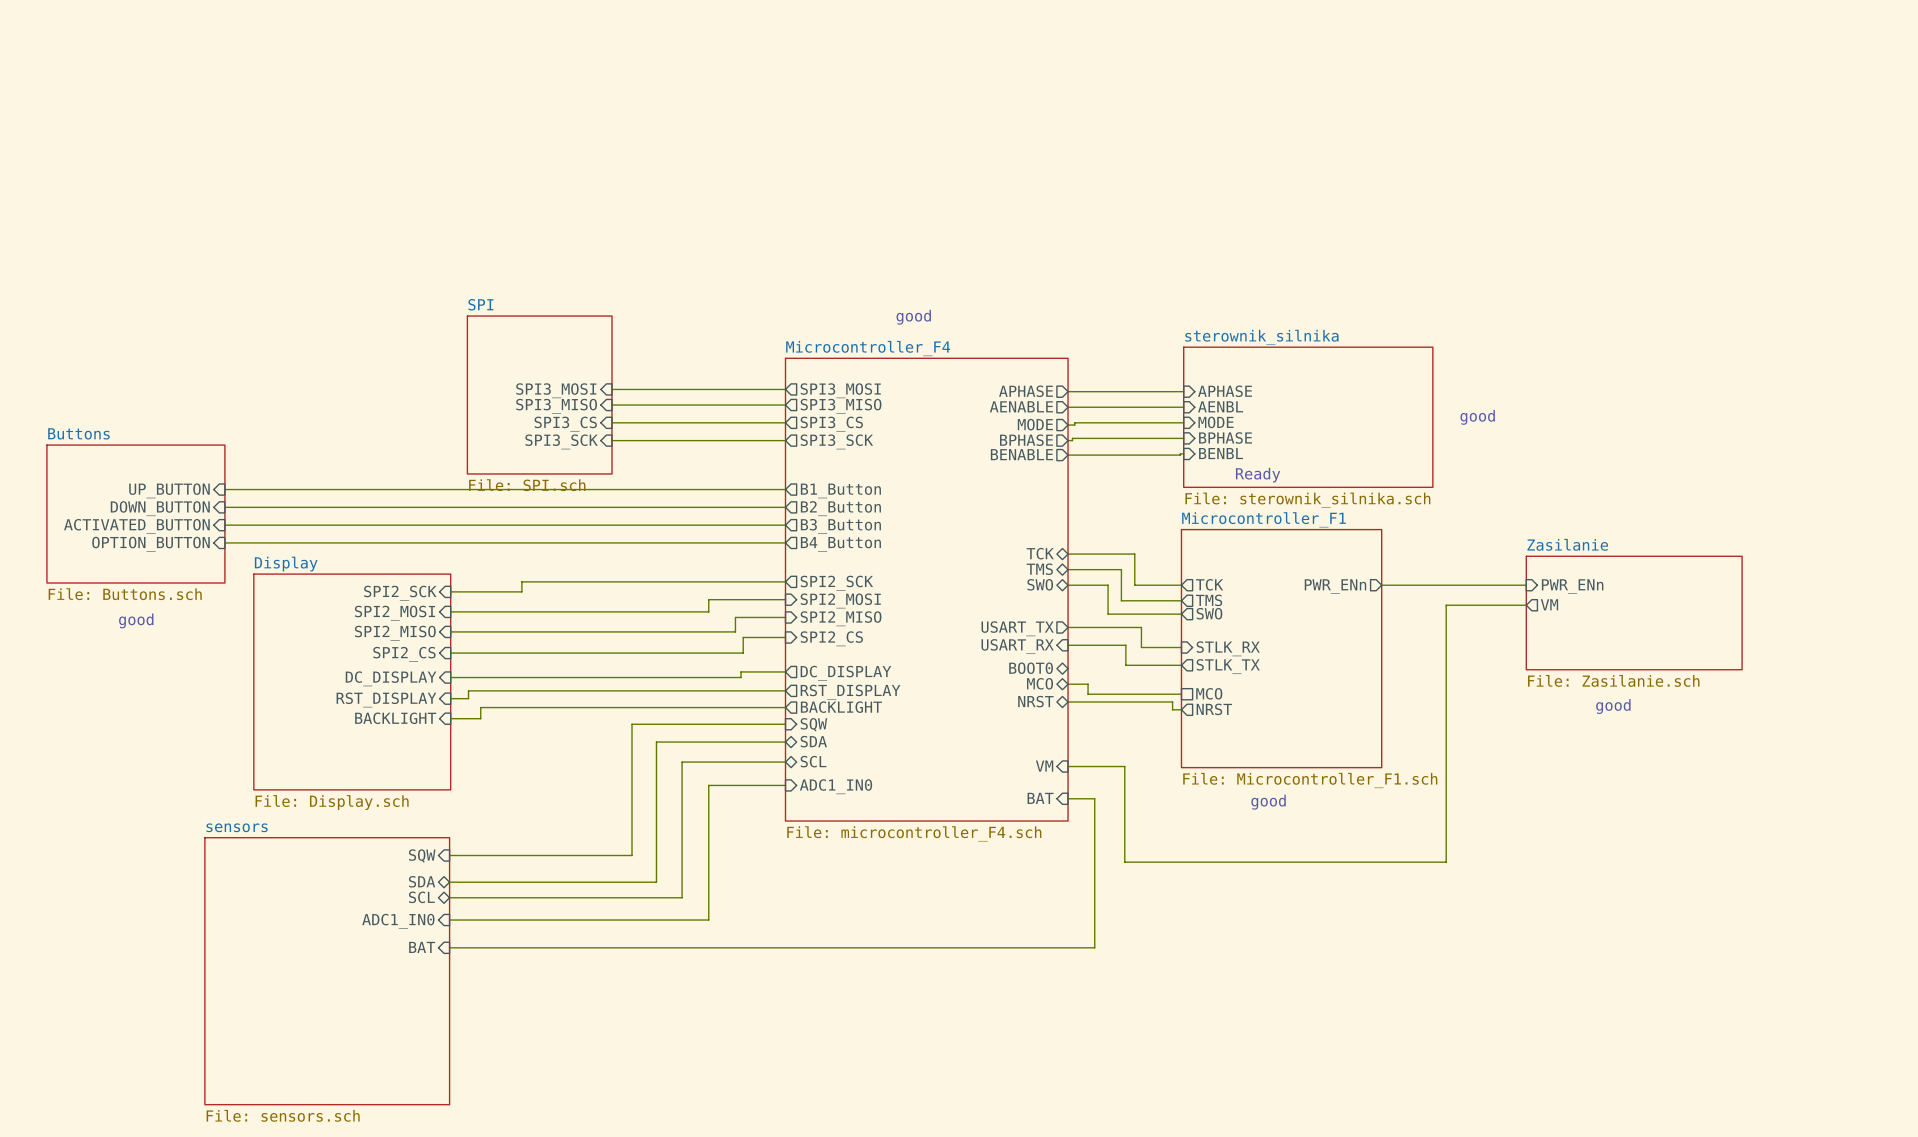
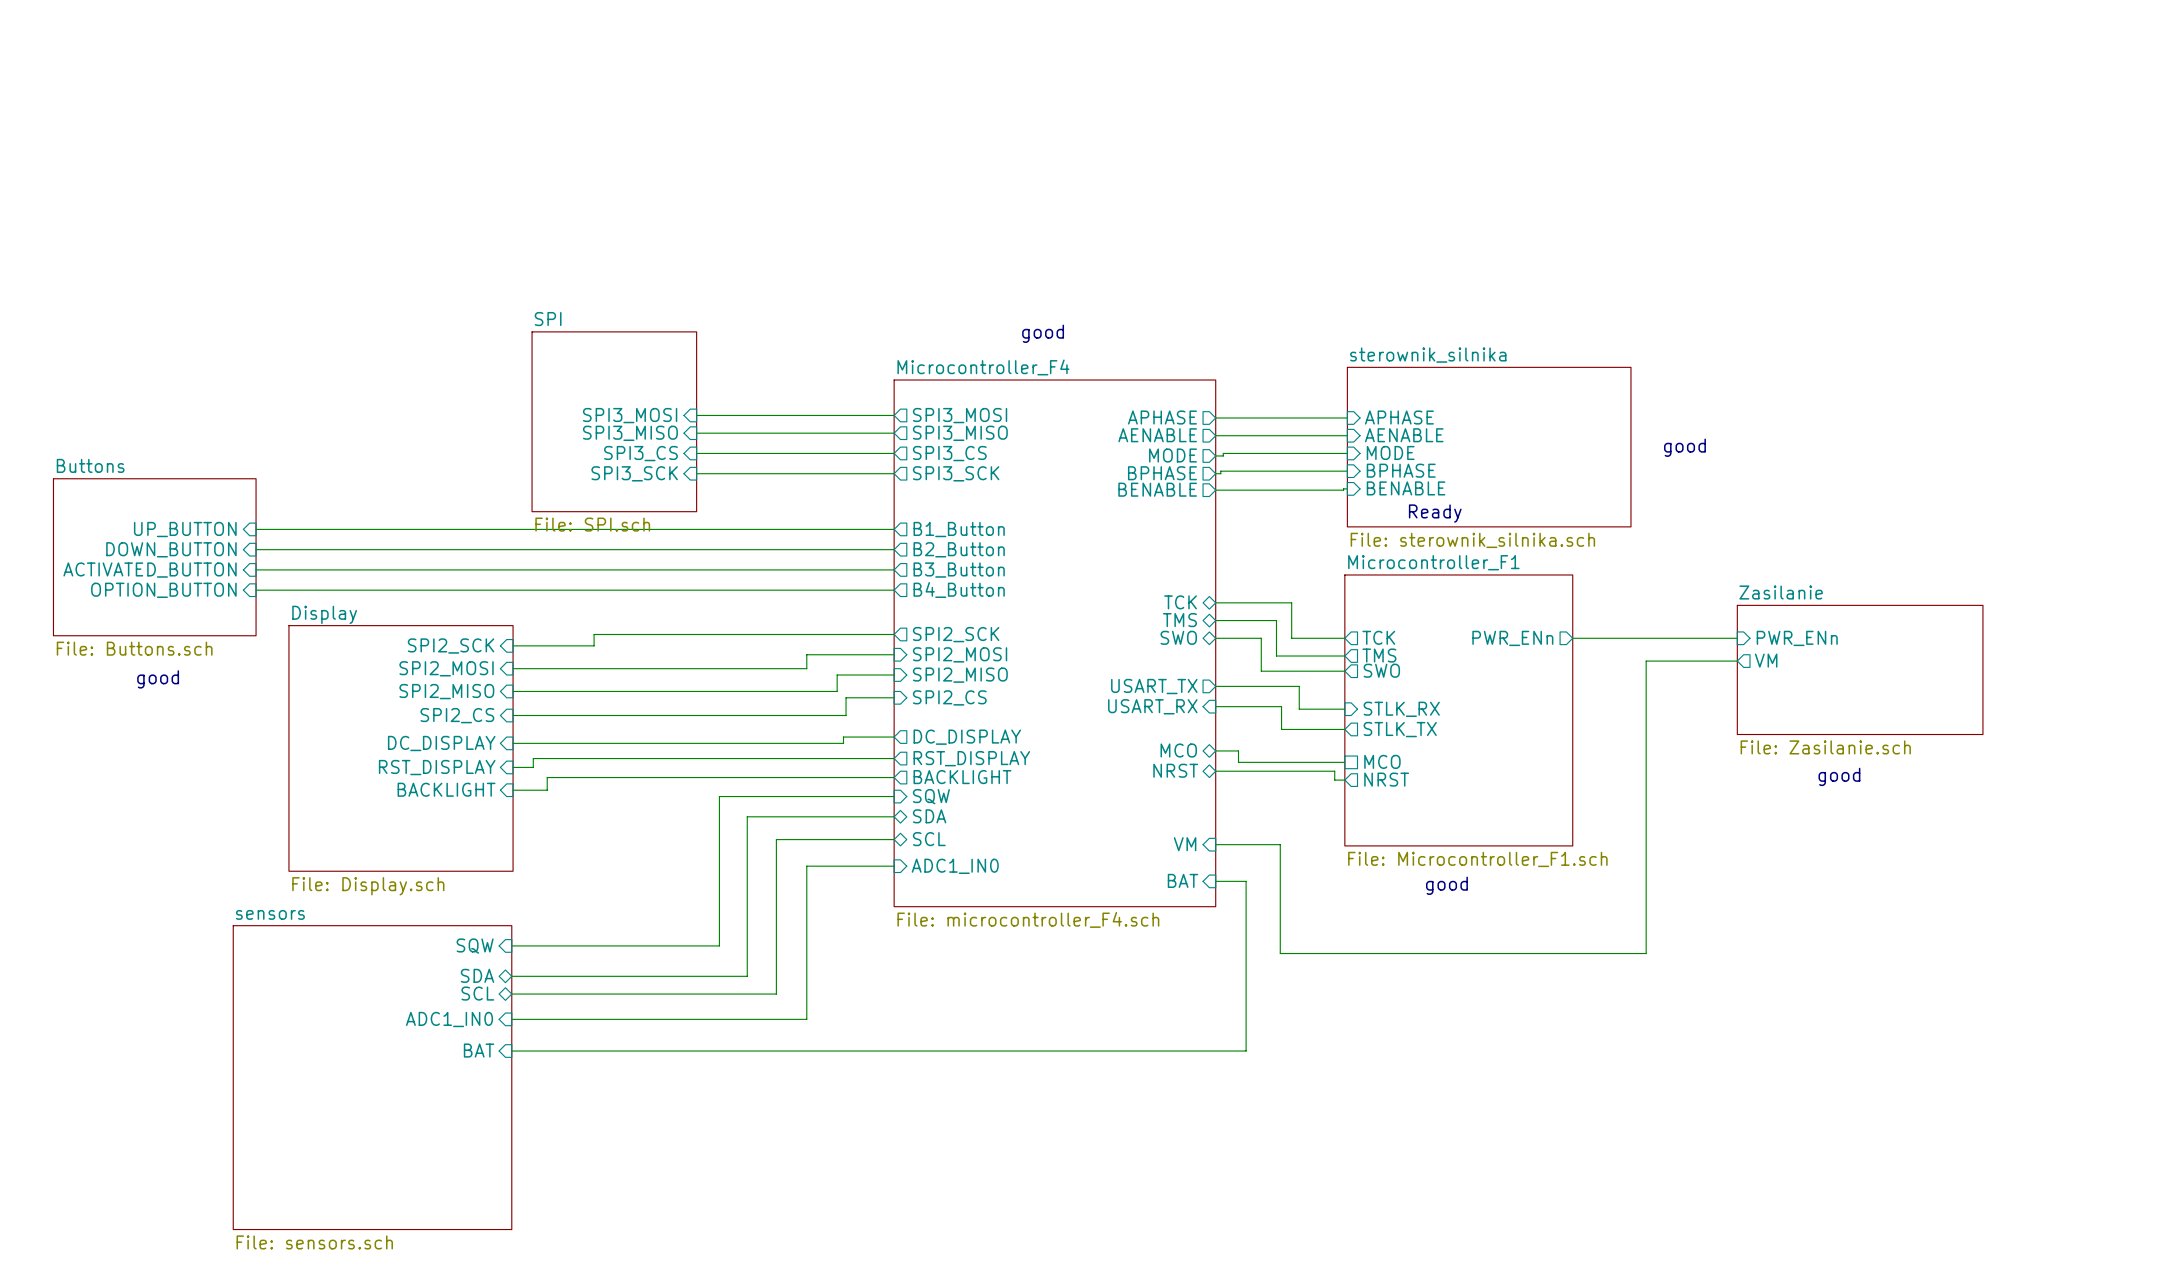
sheet pin: AENBL (1220, 406) -> AENABLE (1404, 435)
sheet pin: BENBL (1221, 453) -> BENABLE (1406, 488)
sheet pin: BOOT0 (1031, 668) -> none

